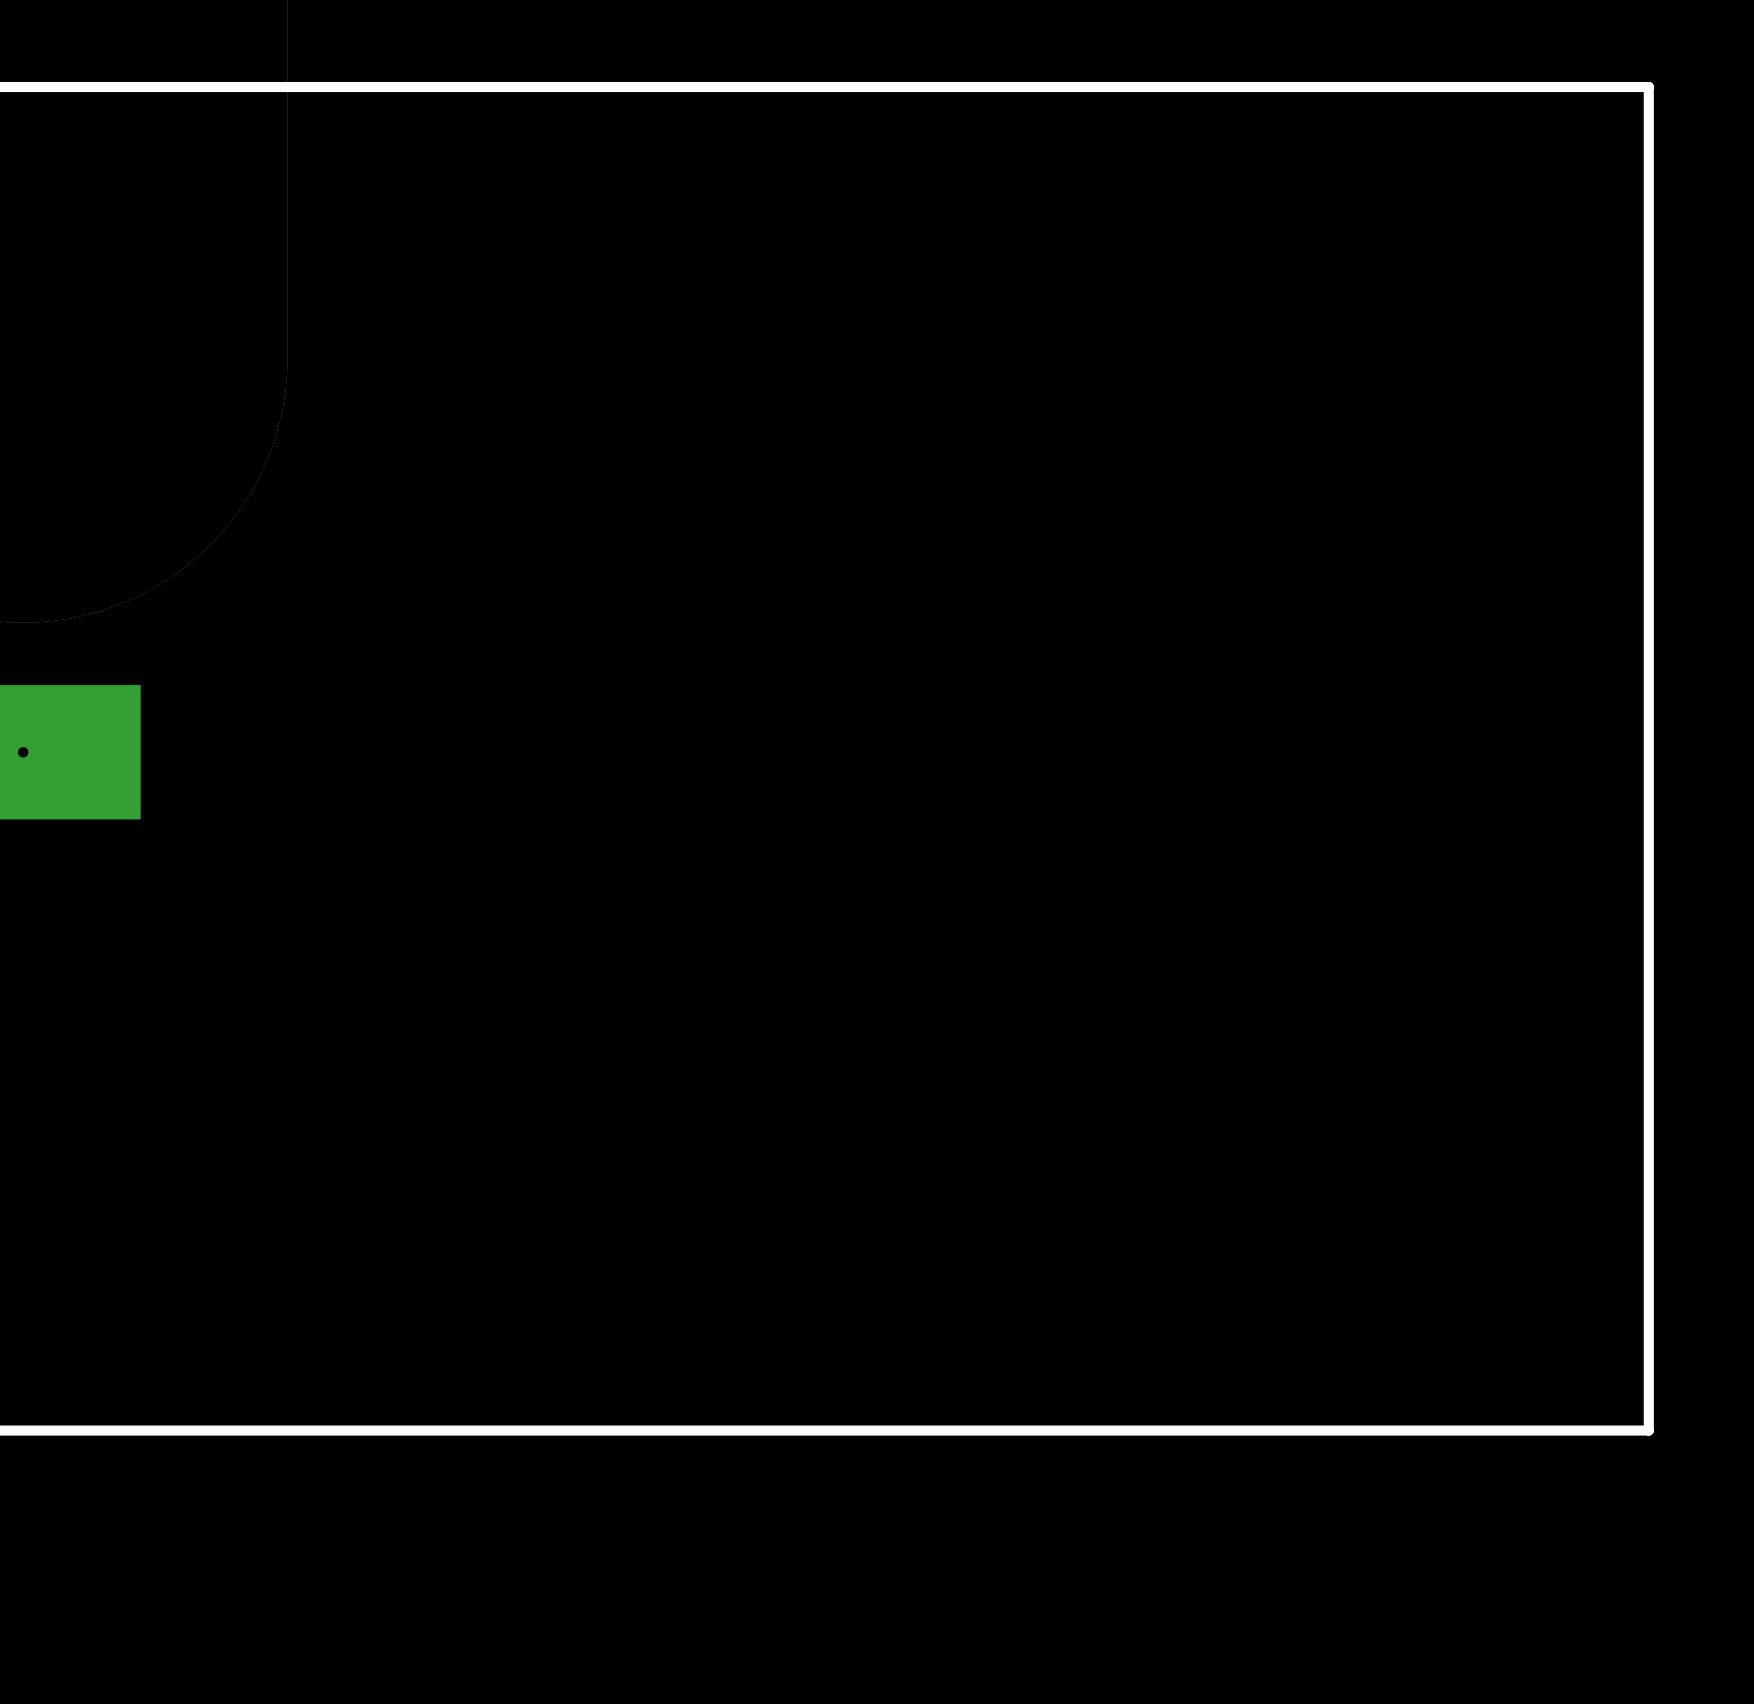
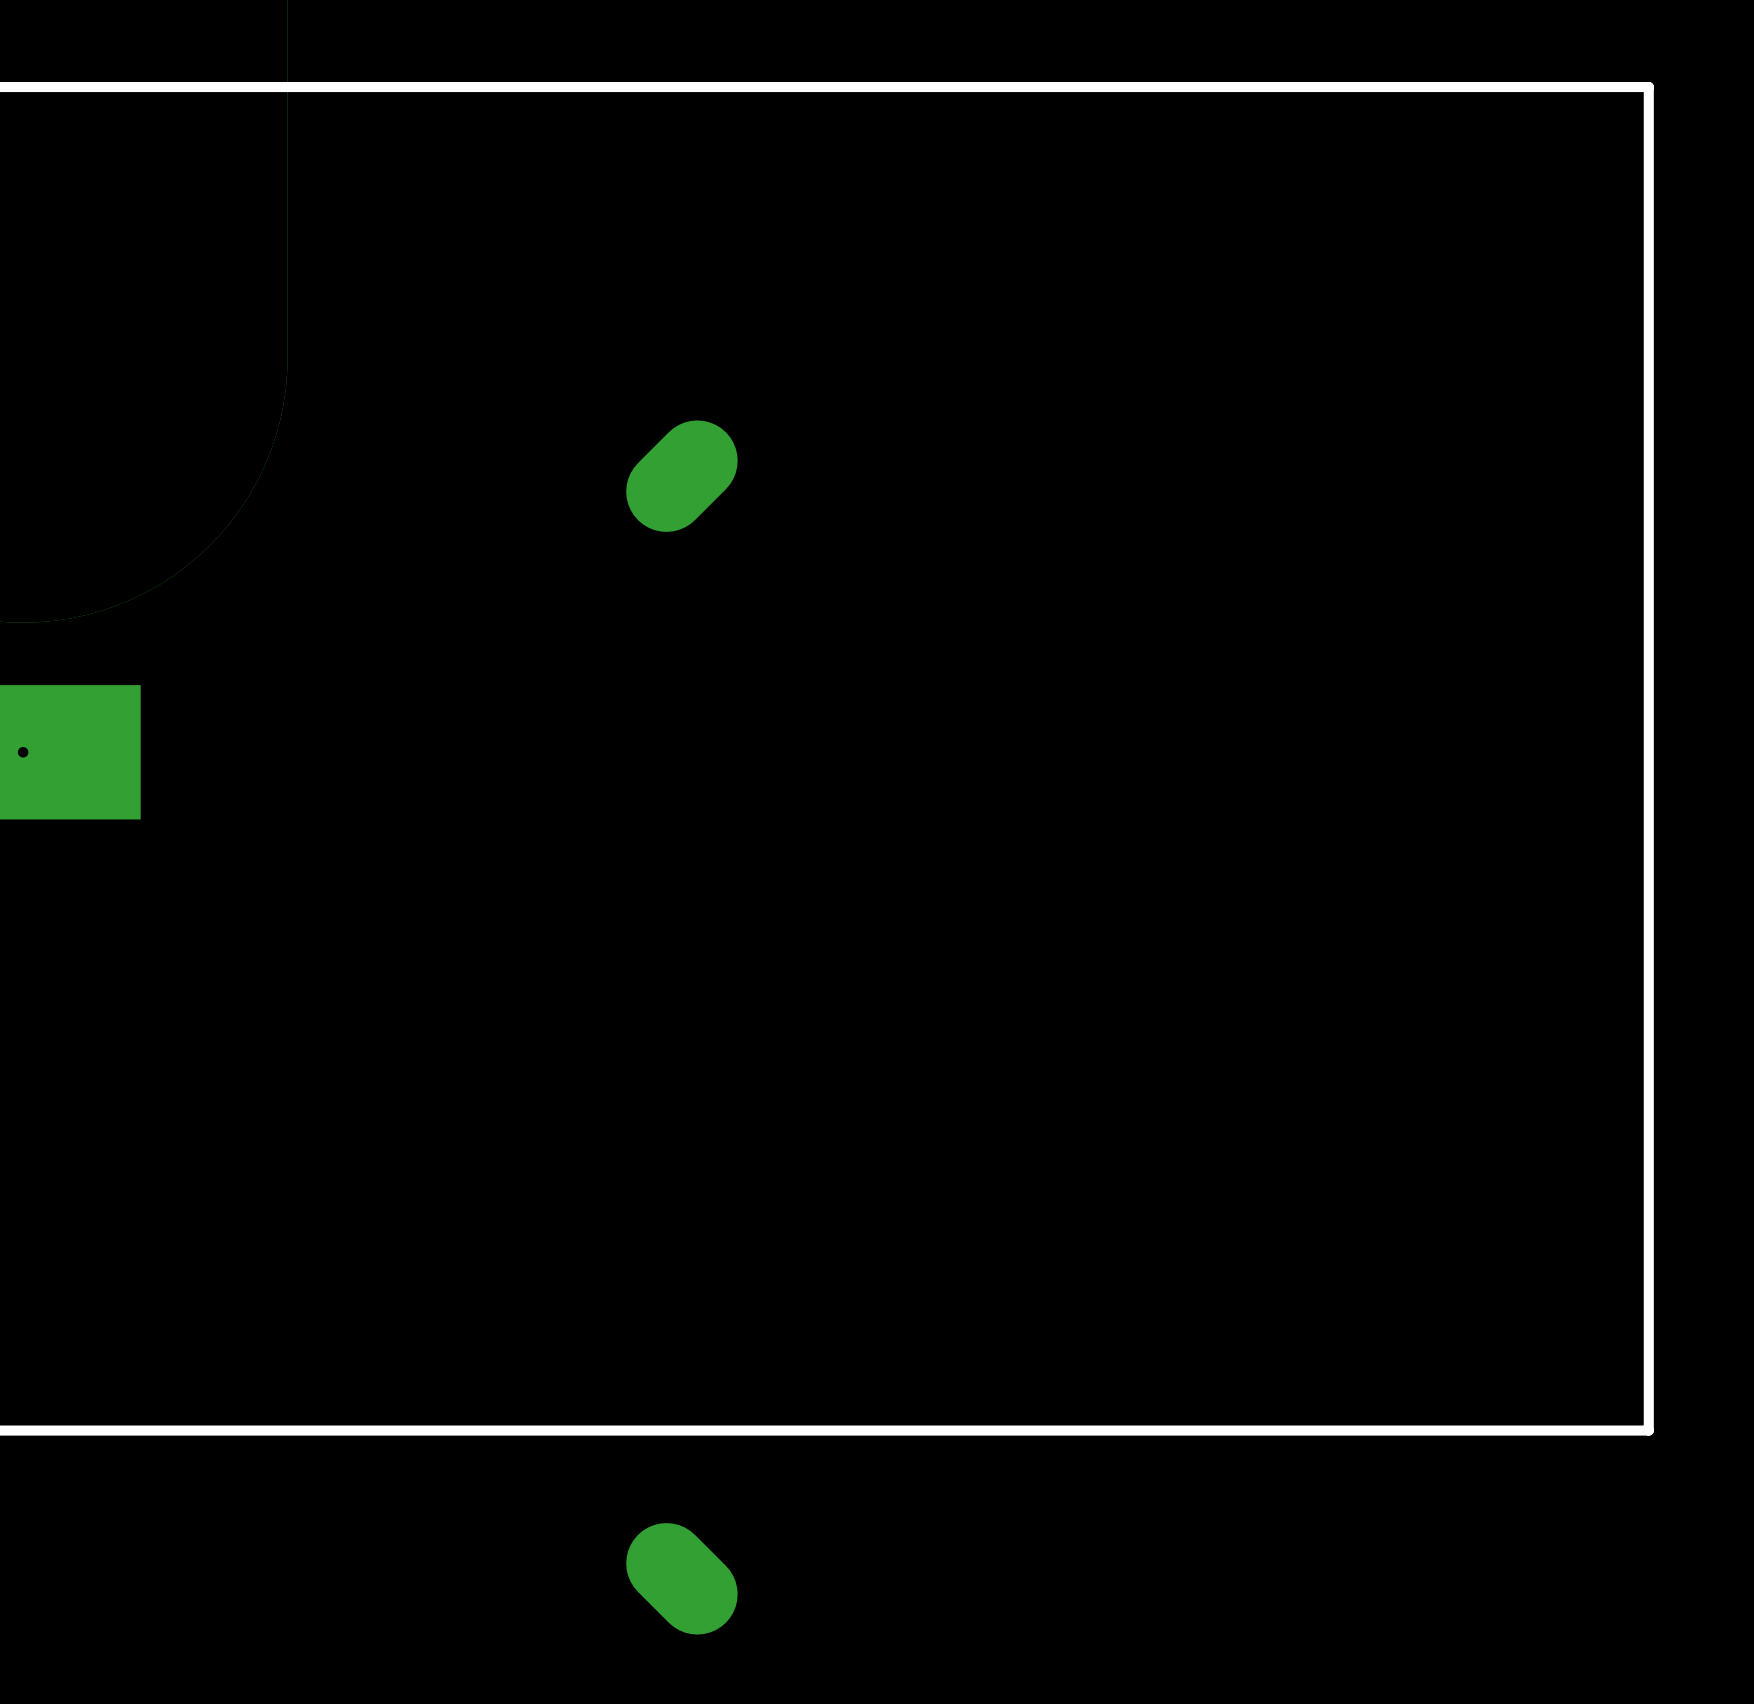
part: none -> (681, 476)
part: none -> (681, 1578)

